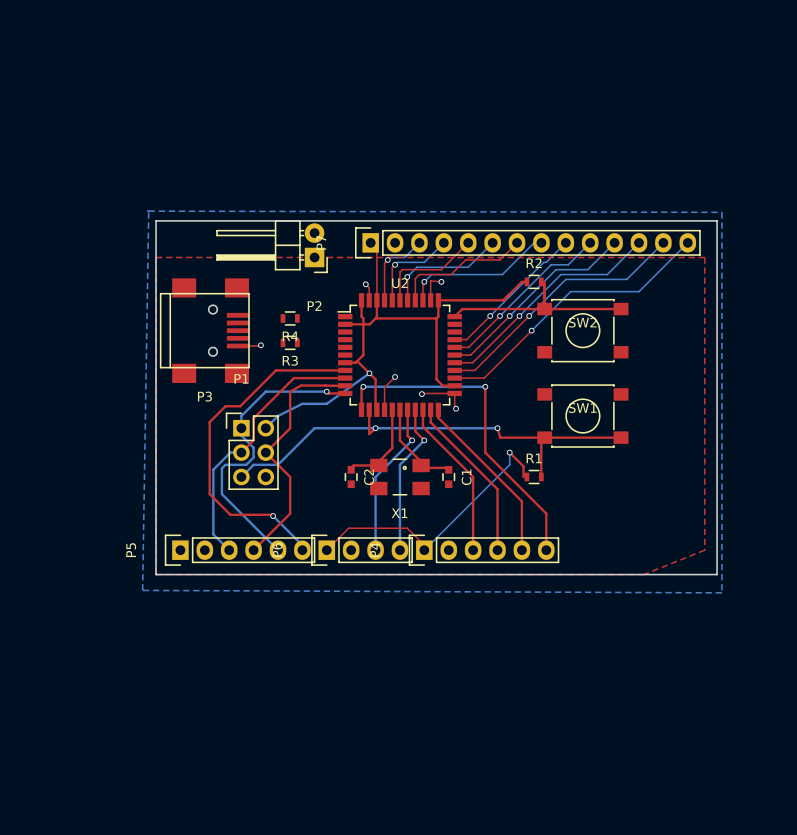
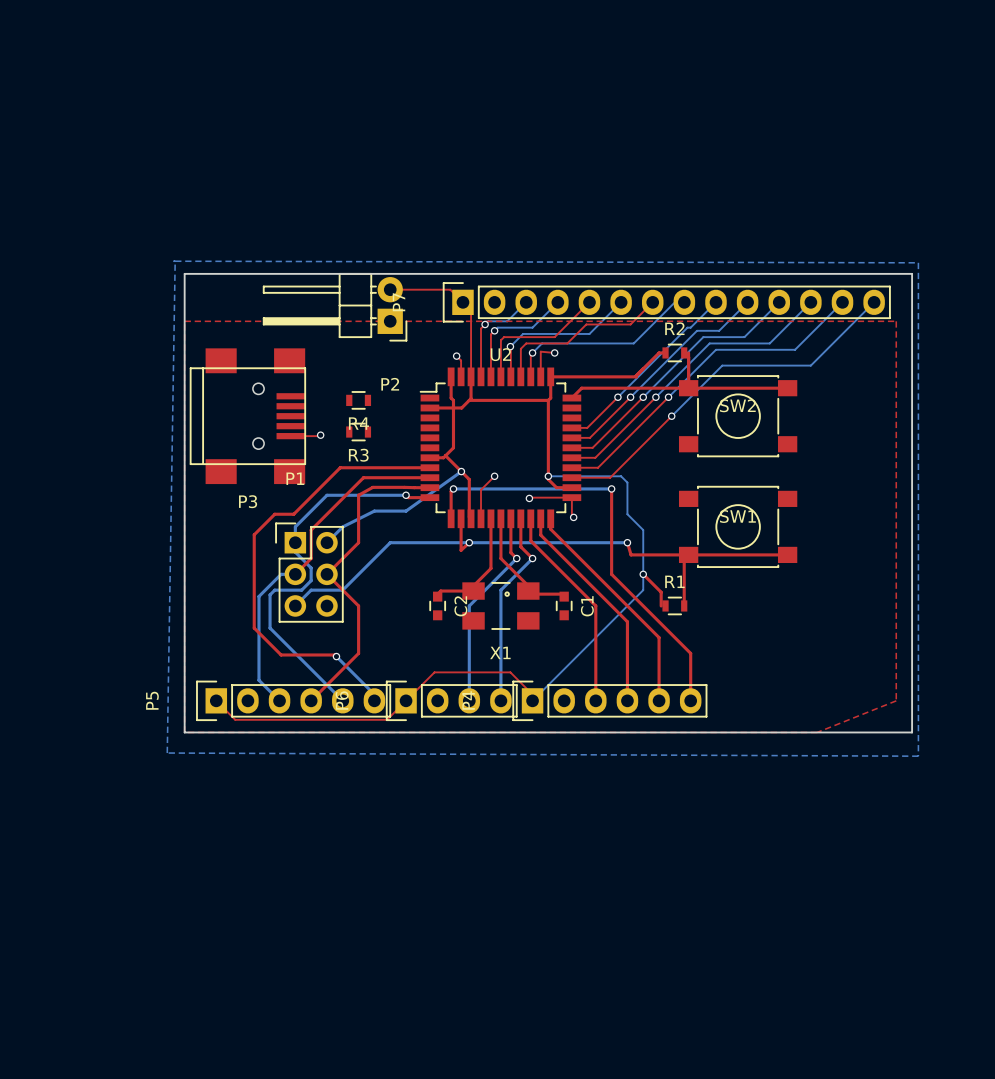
top track: none -> (390, 289) (450, 289) (462, 302)
bottom track: none -> (548, 476) (621, 476) (627, 482) (627, 514) (643, 530) (643, 574)
via: none -> (548, 476)
top track: none -> (216, 700) (235, 719) (387, 719) (406, 700)

